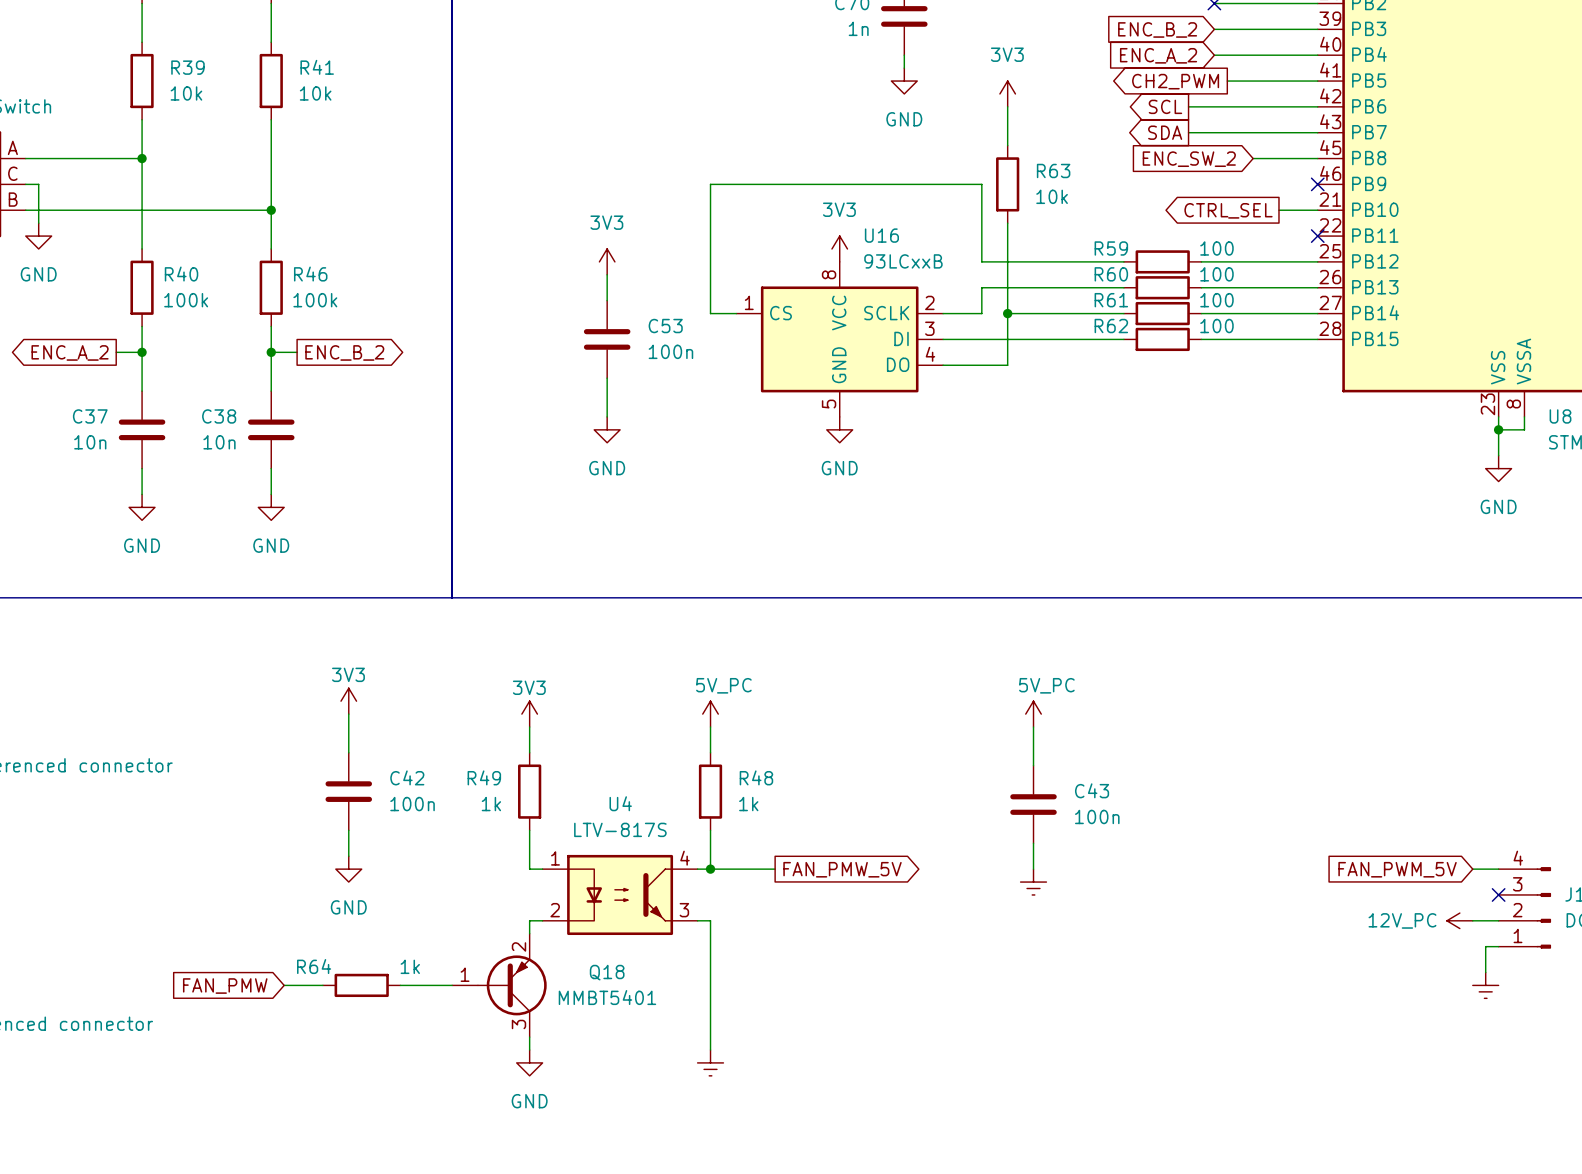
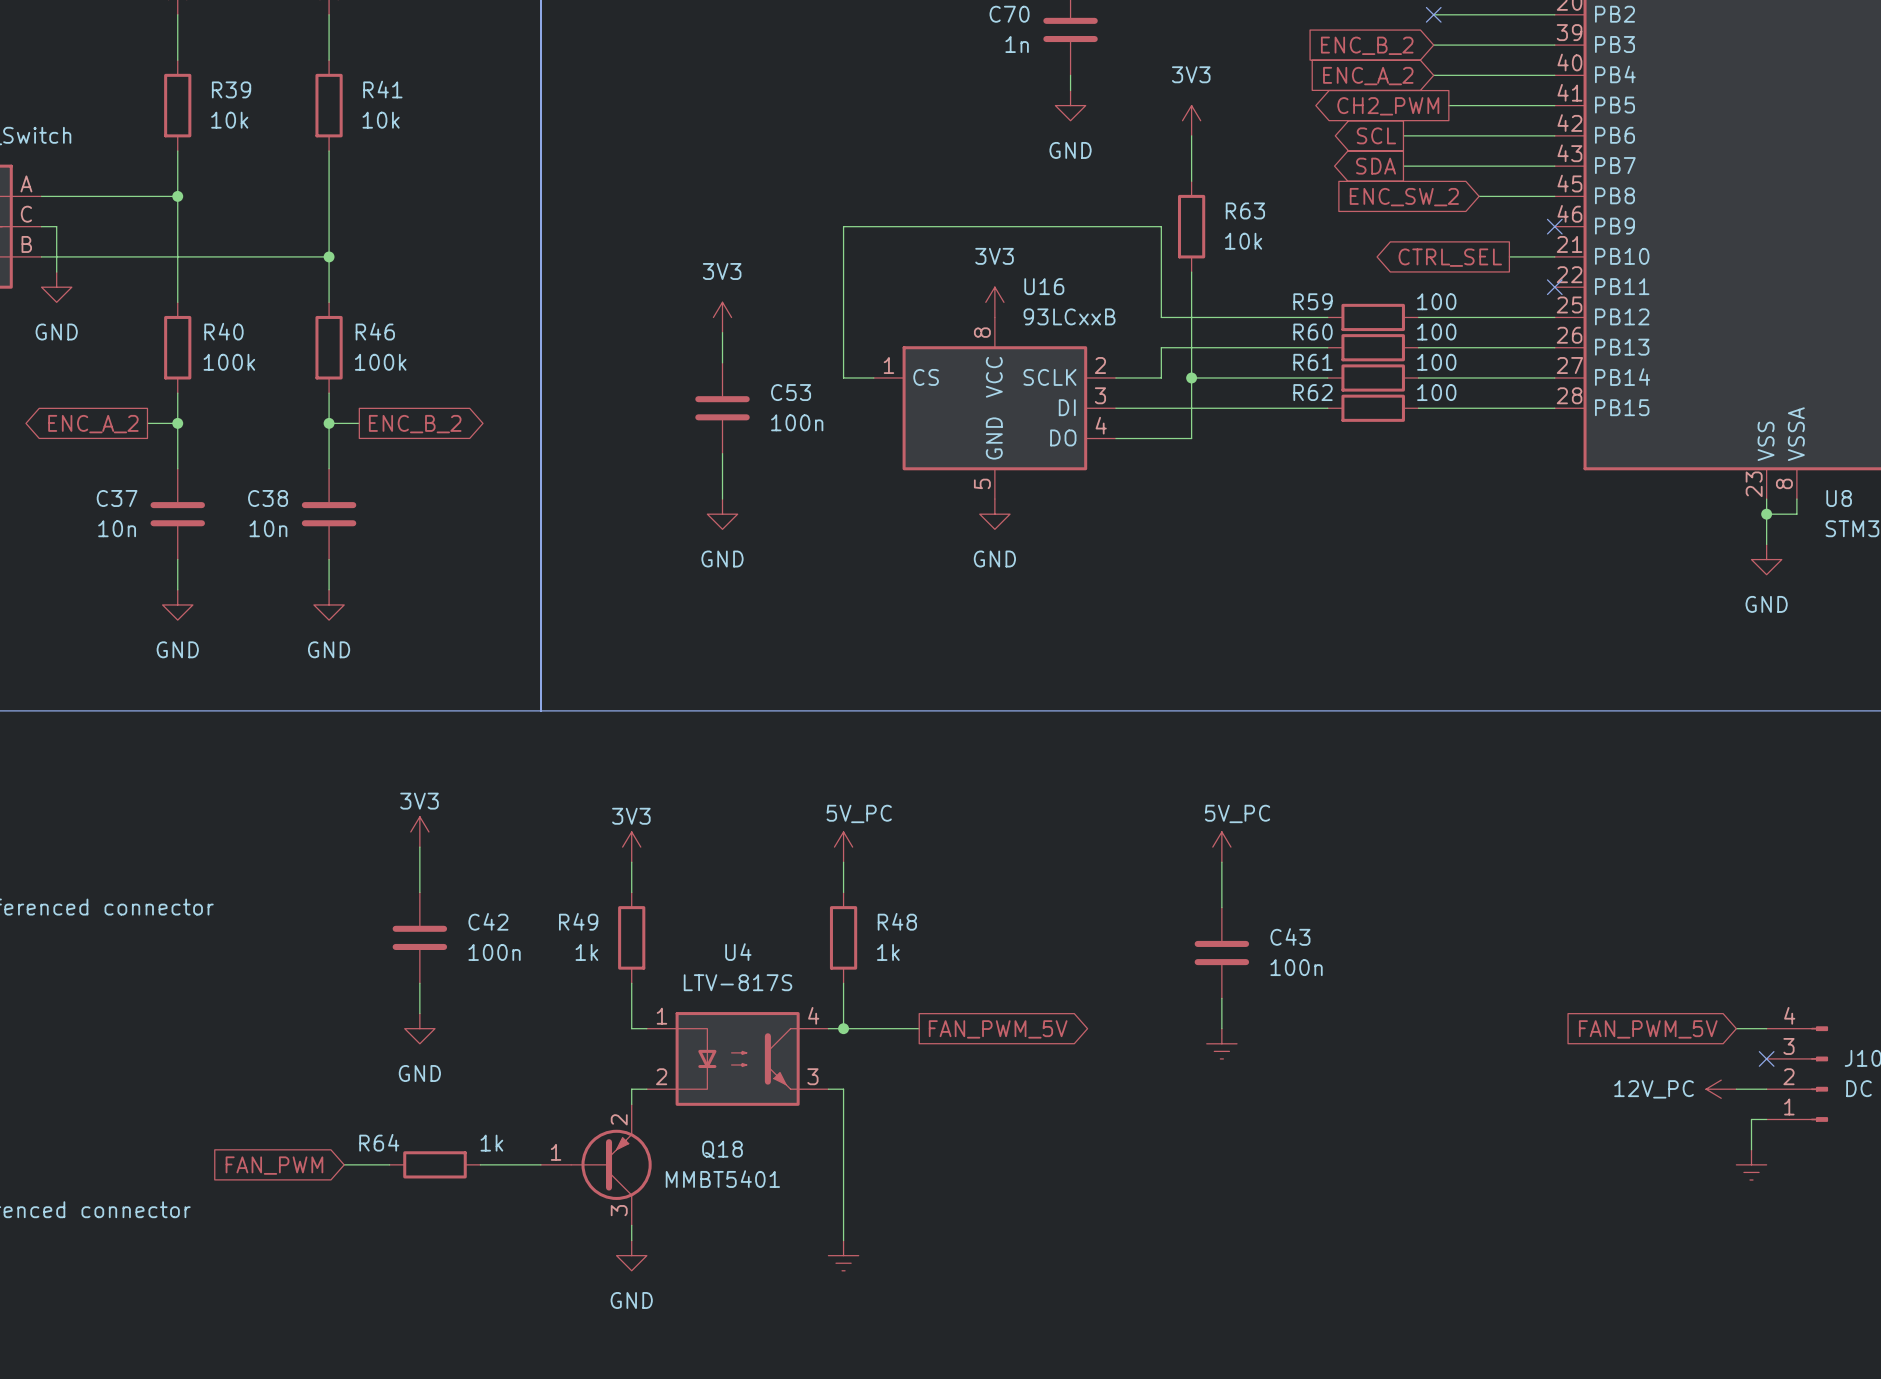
global label: FAN_PMW_5V (842, 869) -> FAN_PWM_5V (998, 1029)
global label: FAN_PMW (225, 986) -> FAN_PWM (274, 1165)

